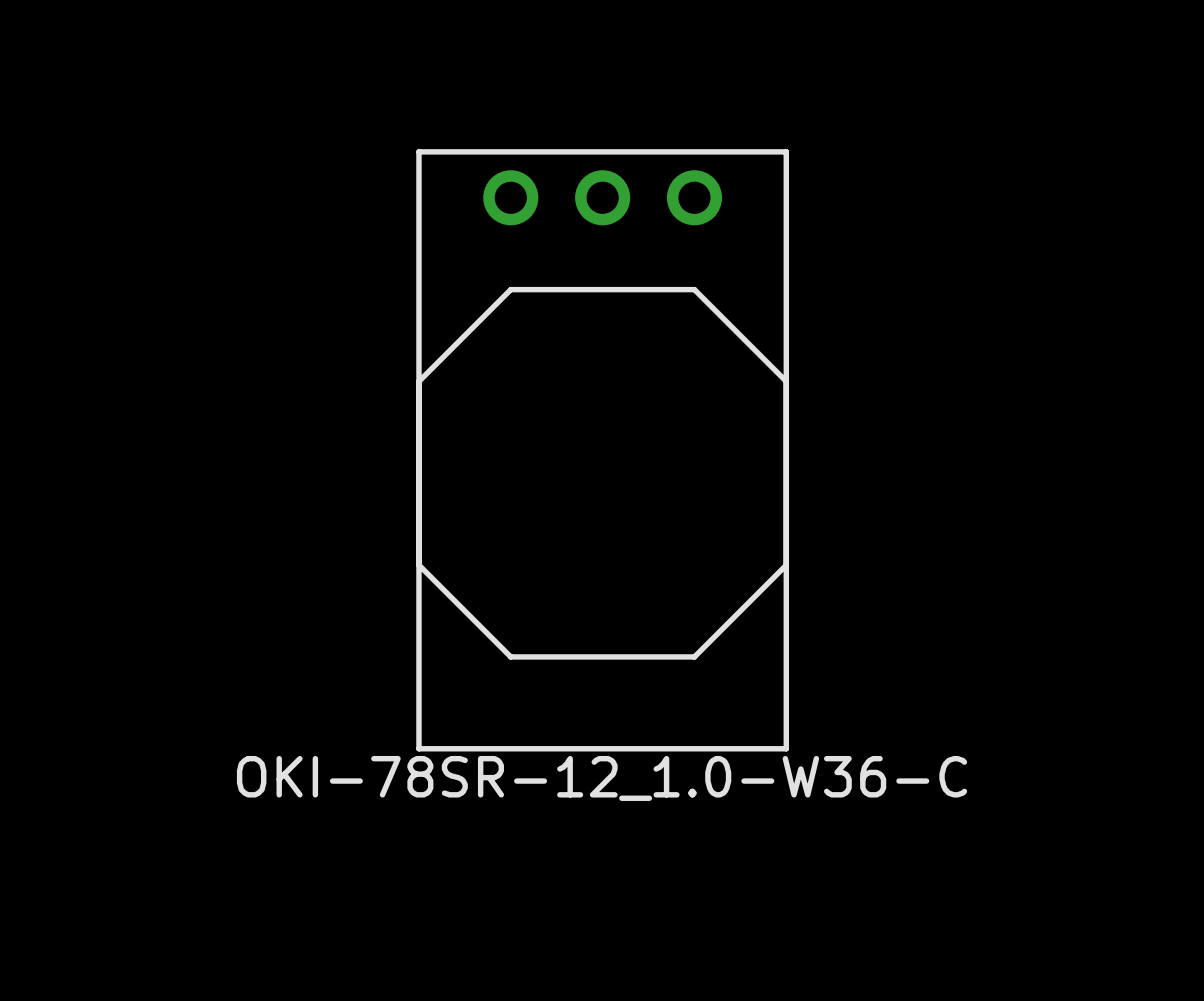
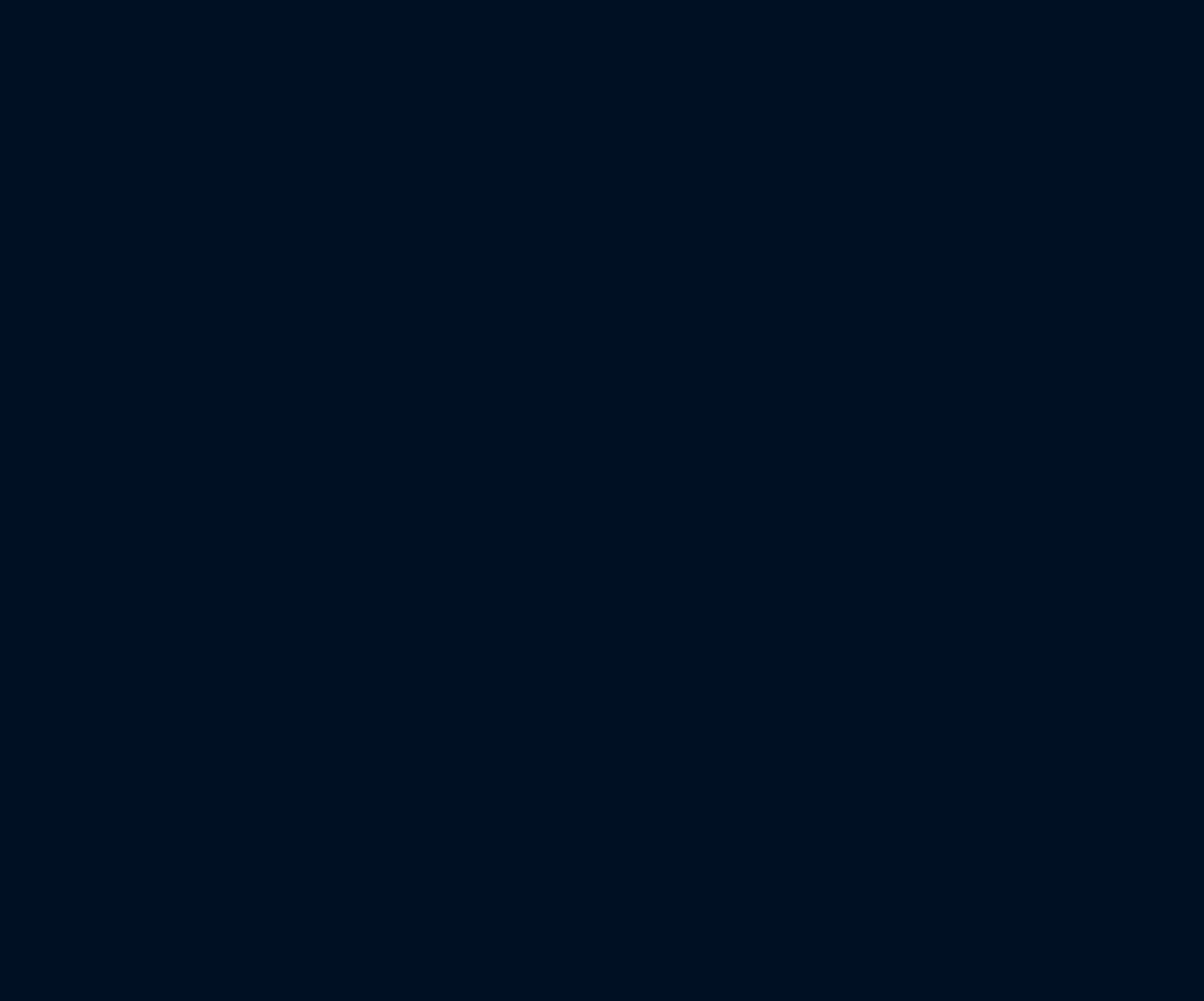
part: OKI-78SR-12_1.0-W36-C (602, 450) -> none

